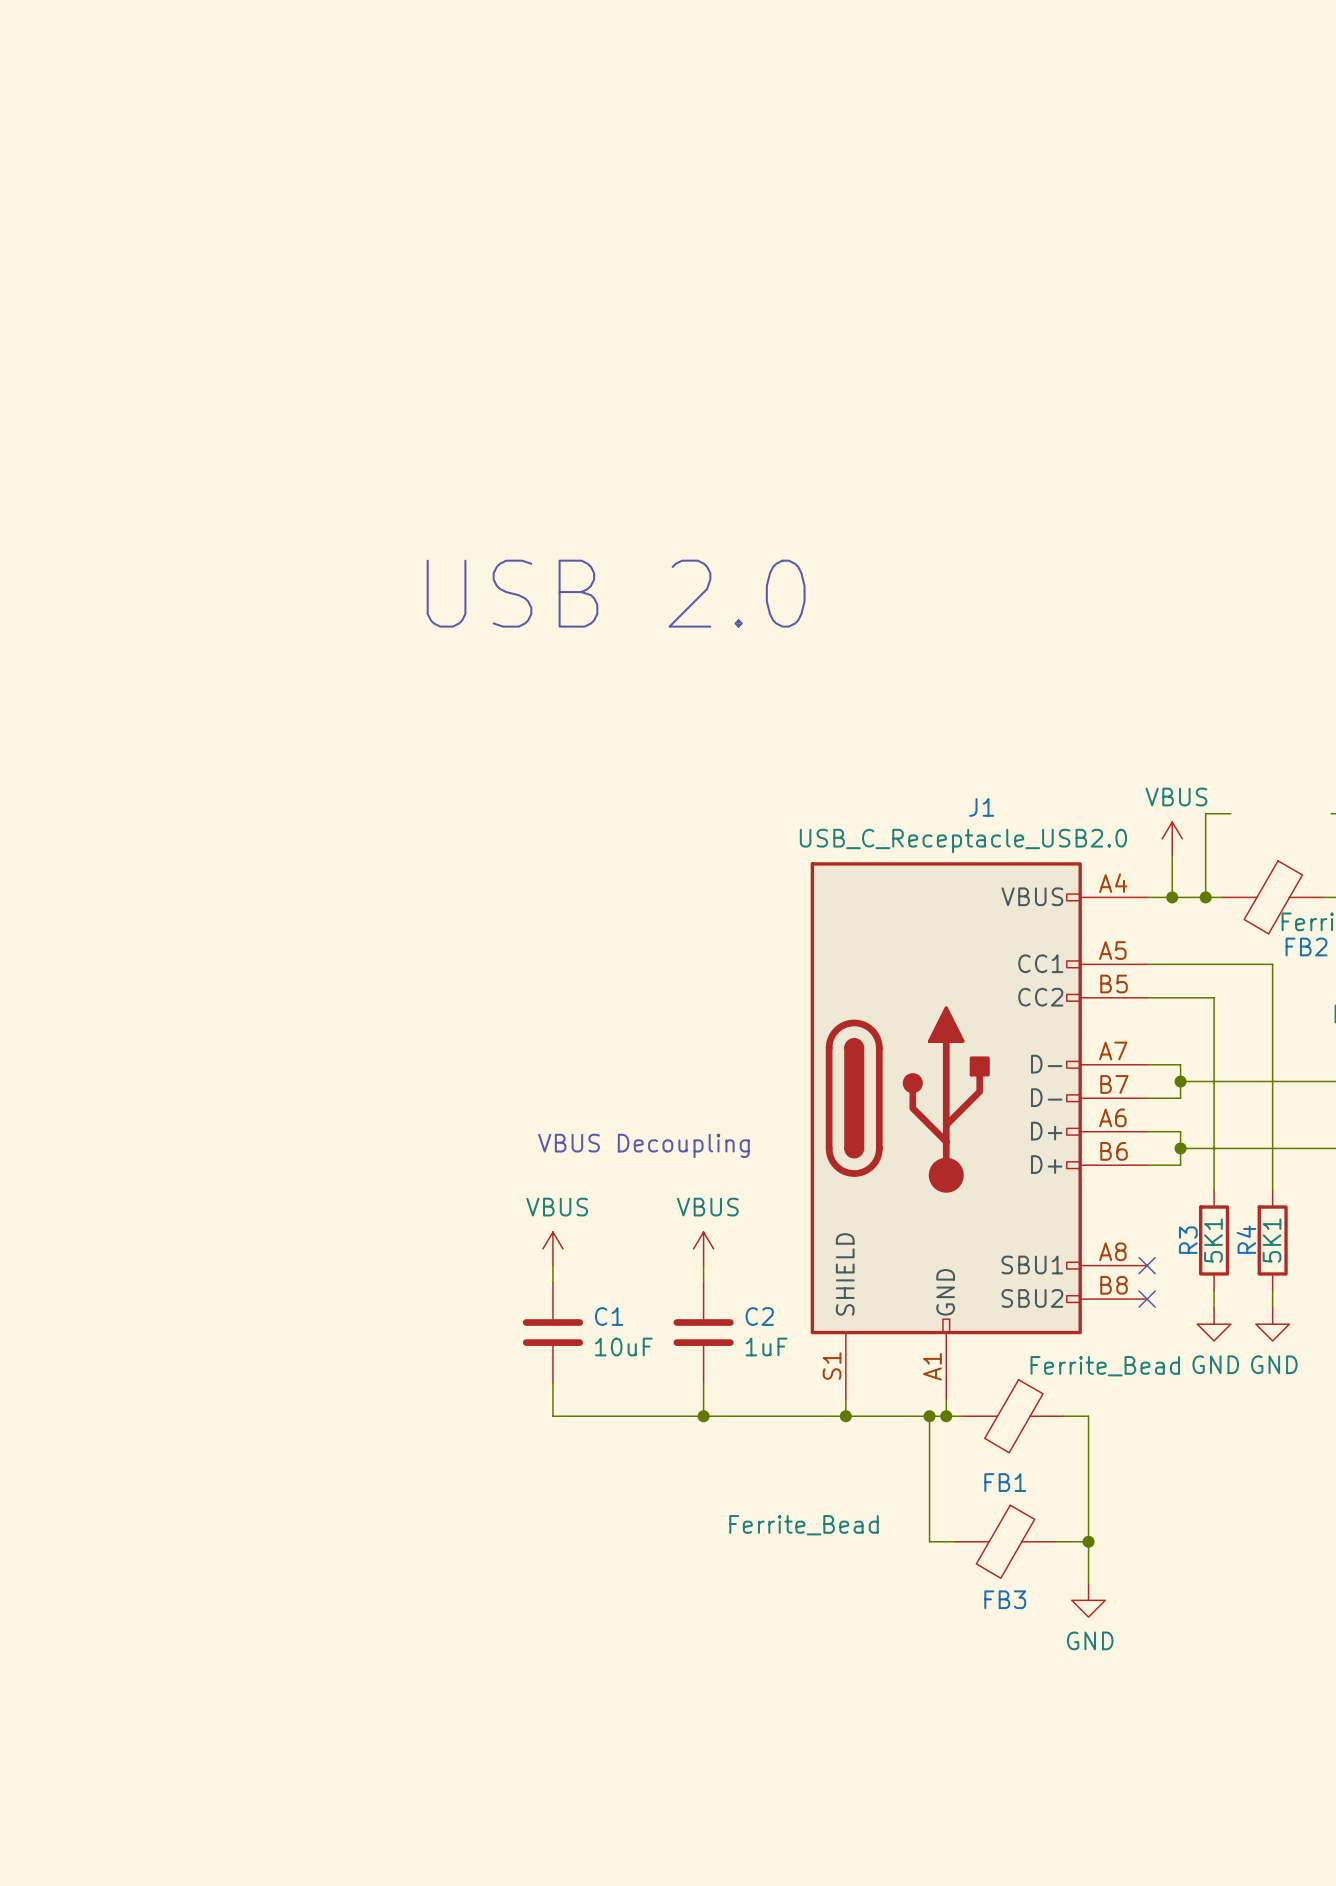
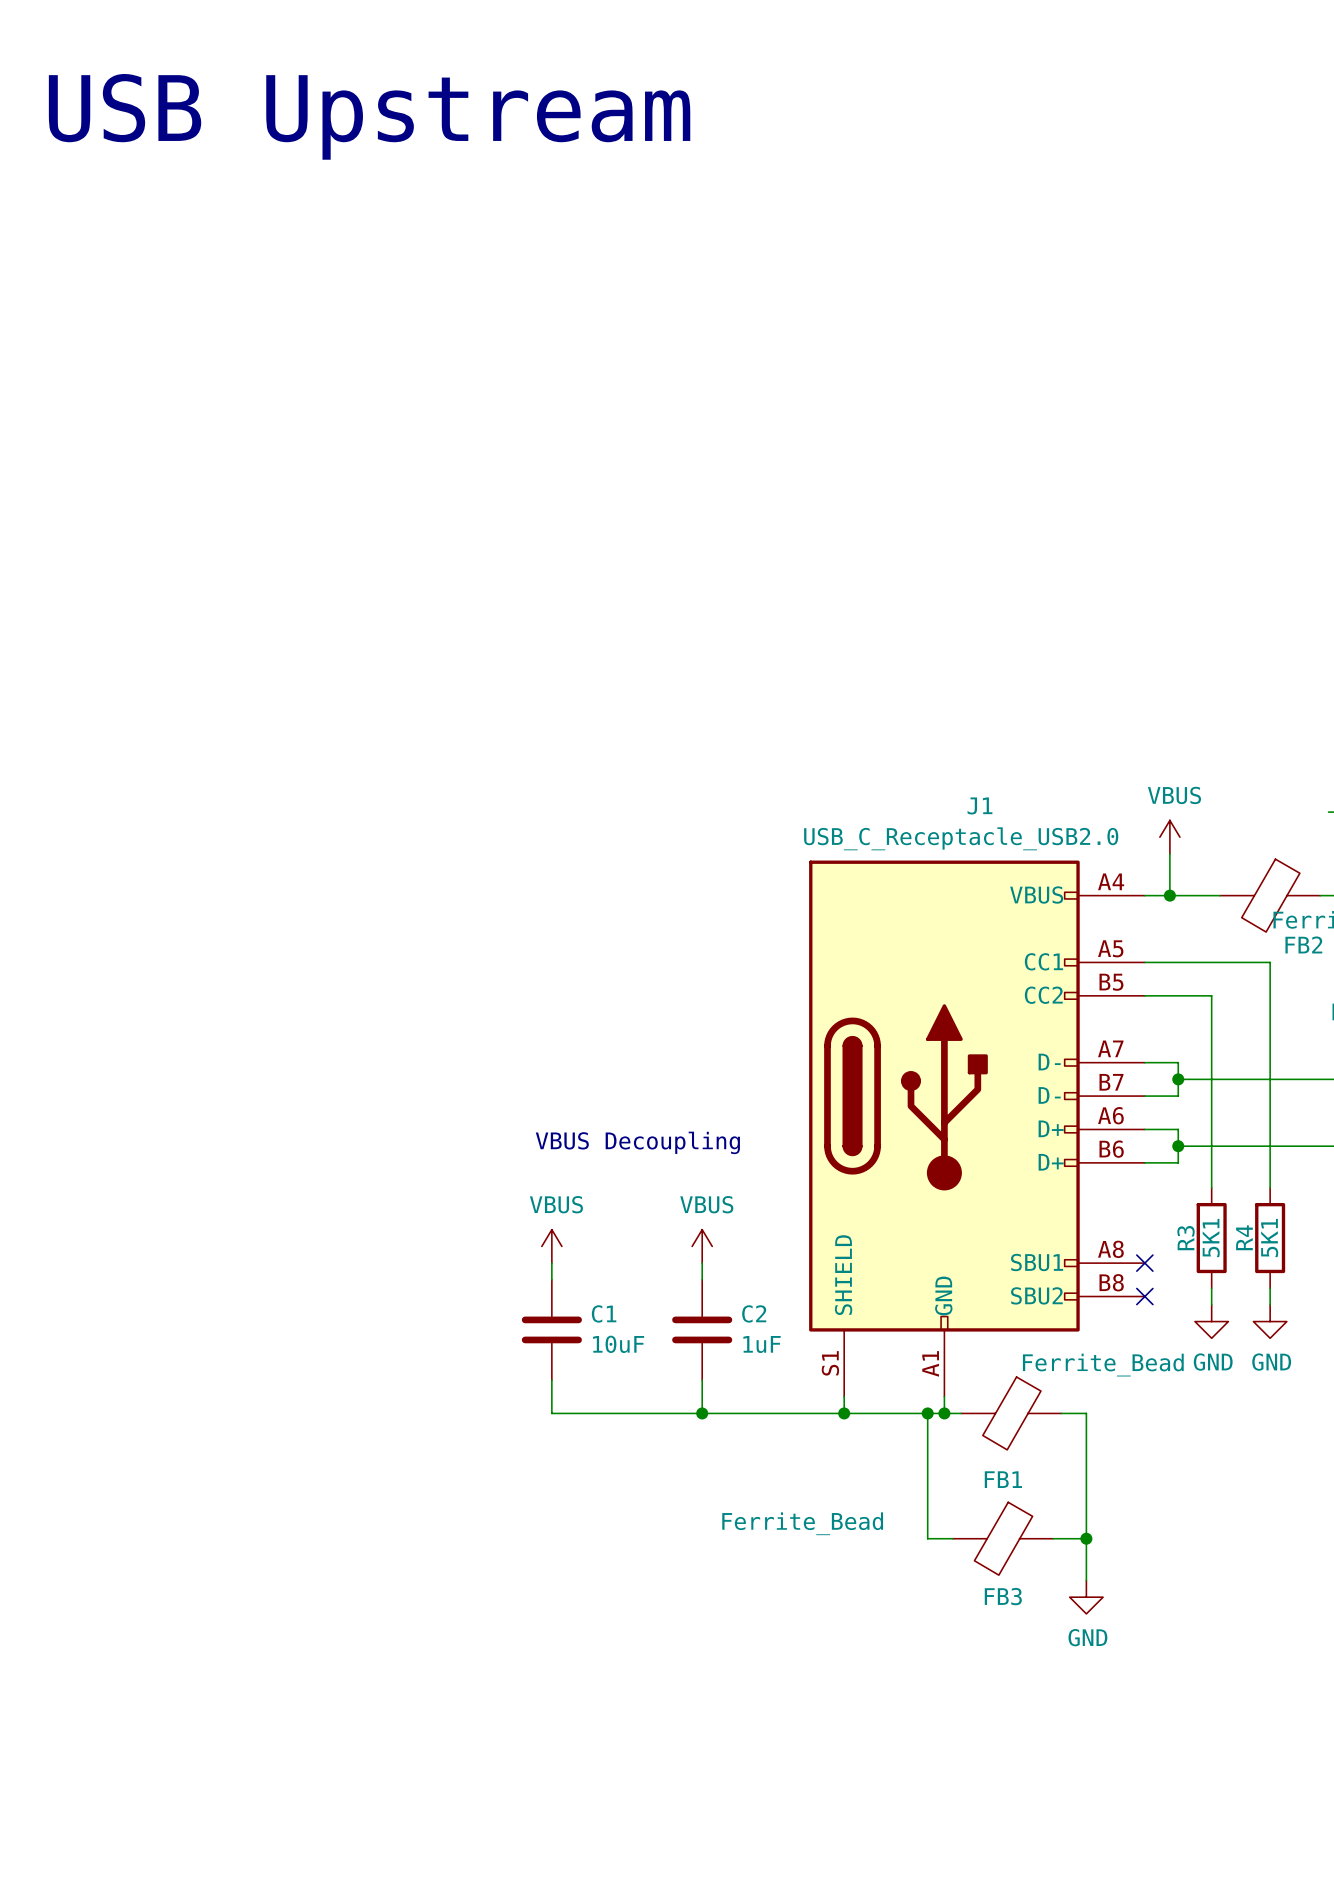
text: none -> USB Upstream (369, 116)
text: USB 2.0 (616, 593) -> none
wire: (1230, 813) (1205, 813) (1205, 897) -> none
junction: (1205, 897) -> none

